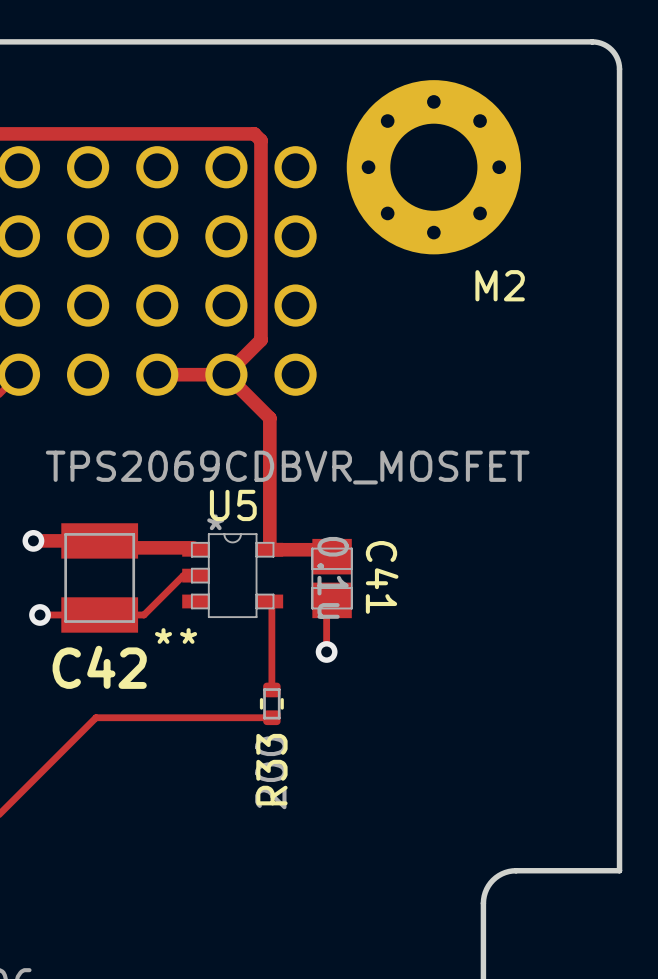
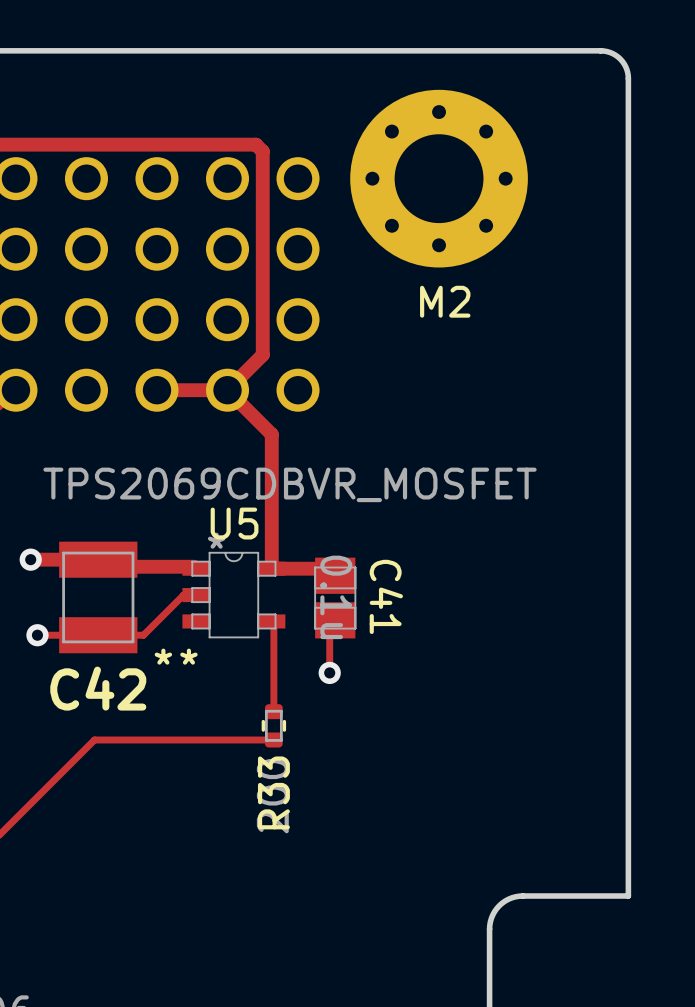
M2 name position: M2 (500, 285) -> M2 (445, 301)

